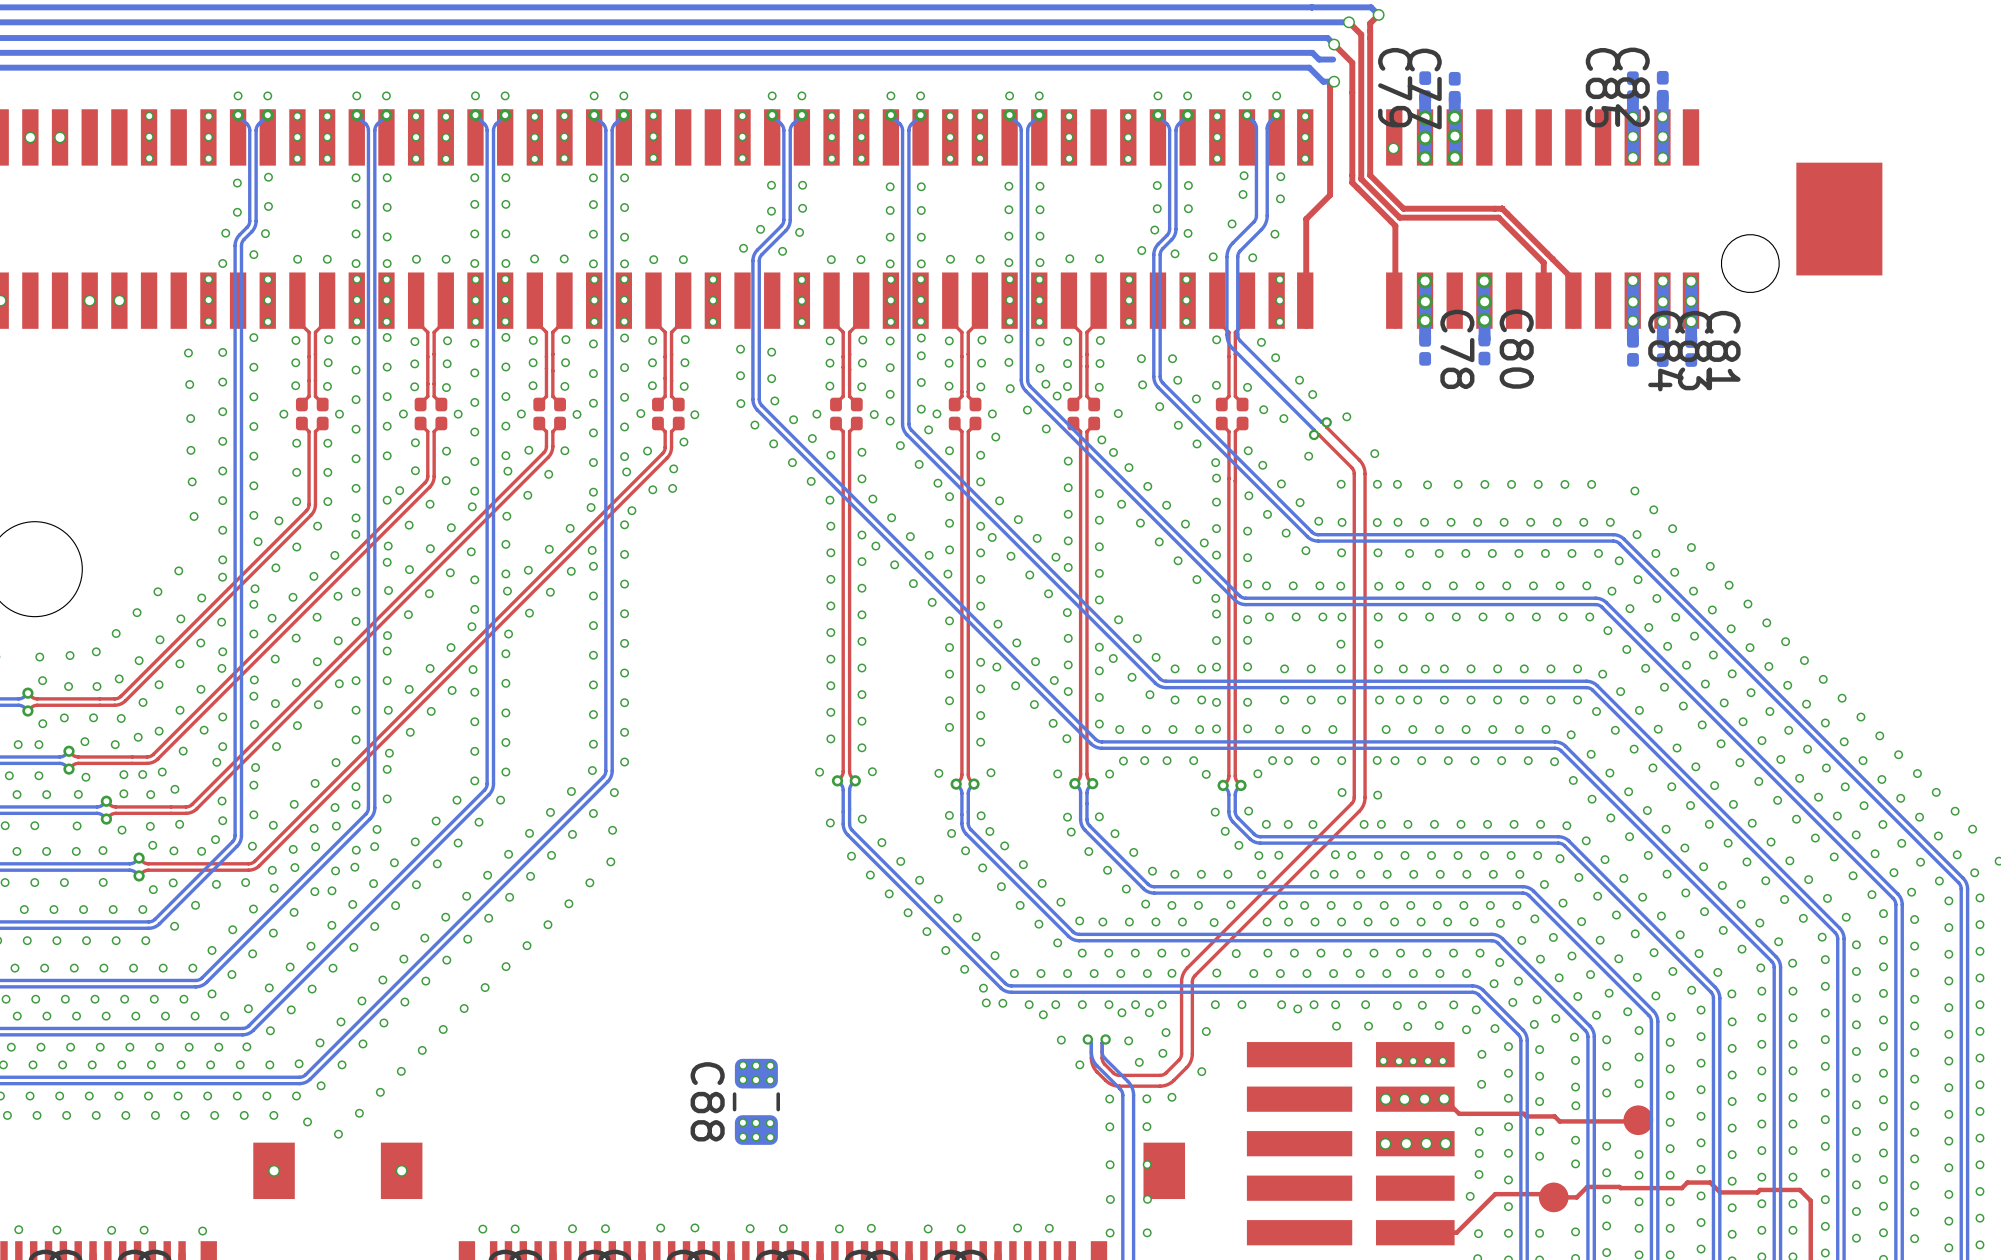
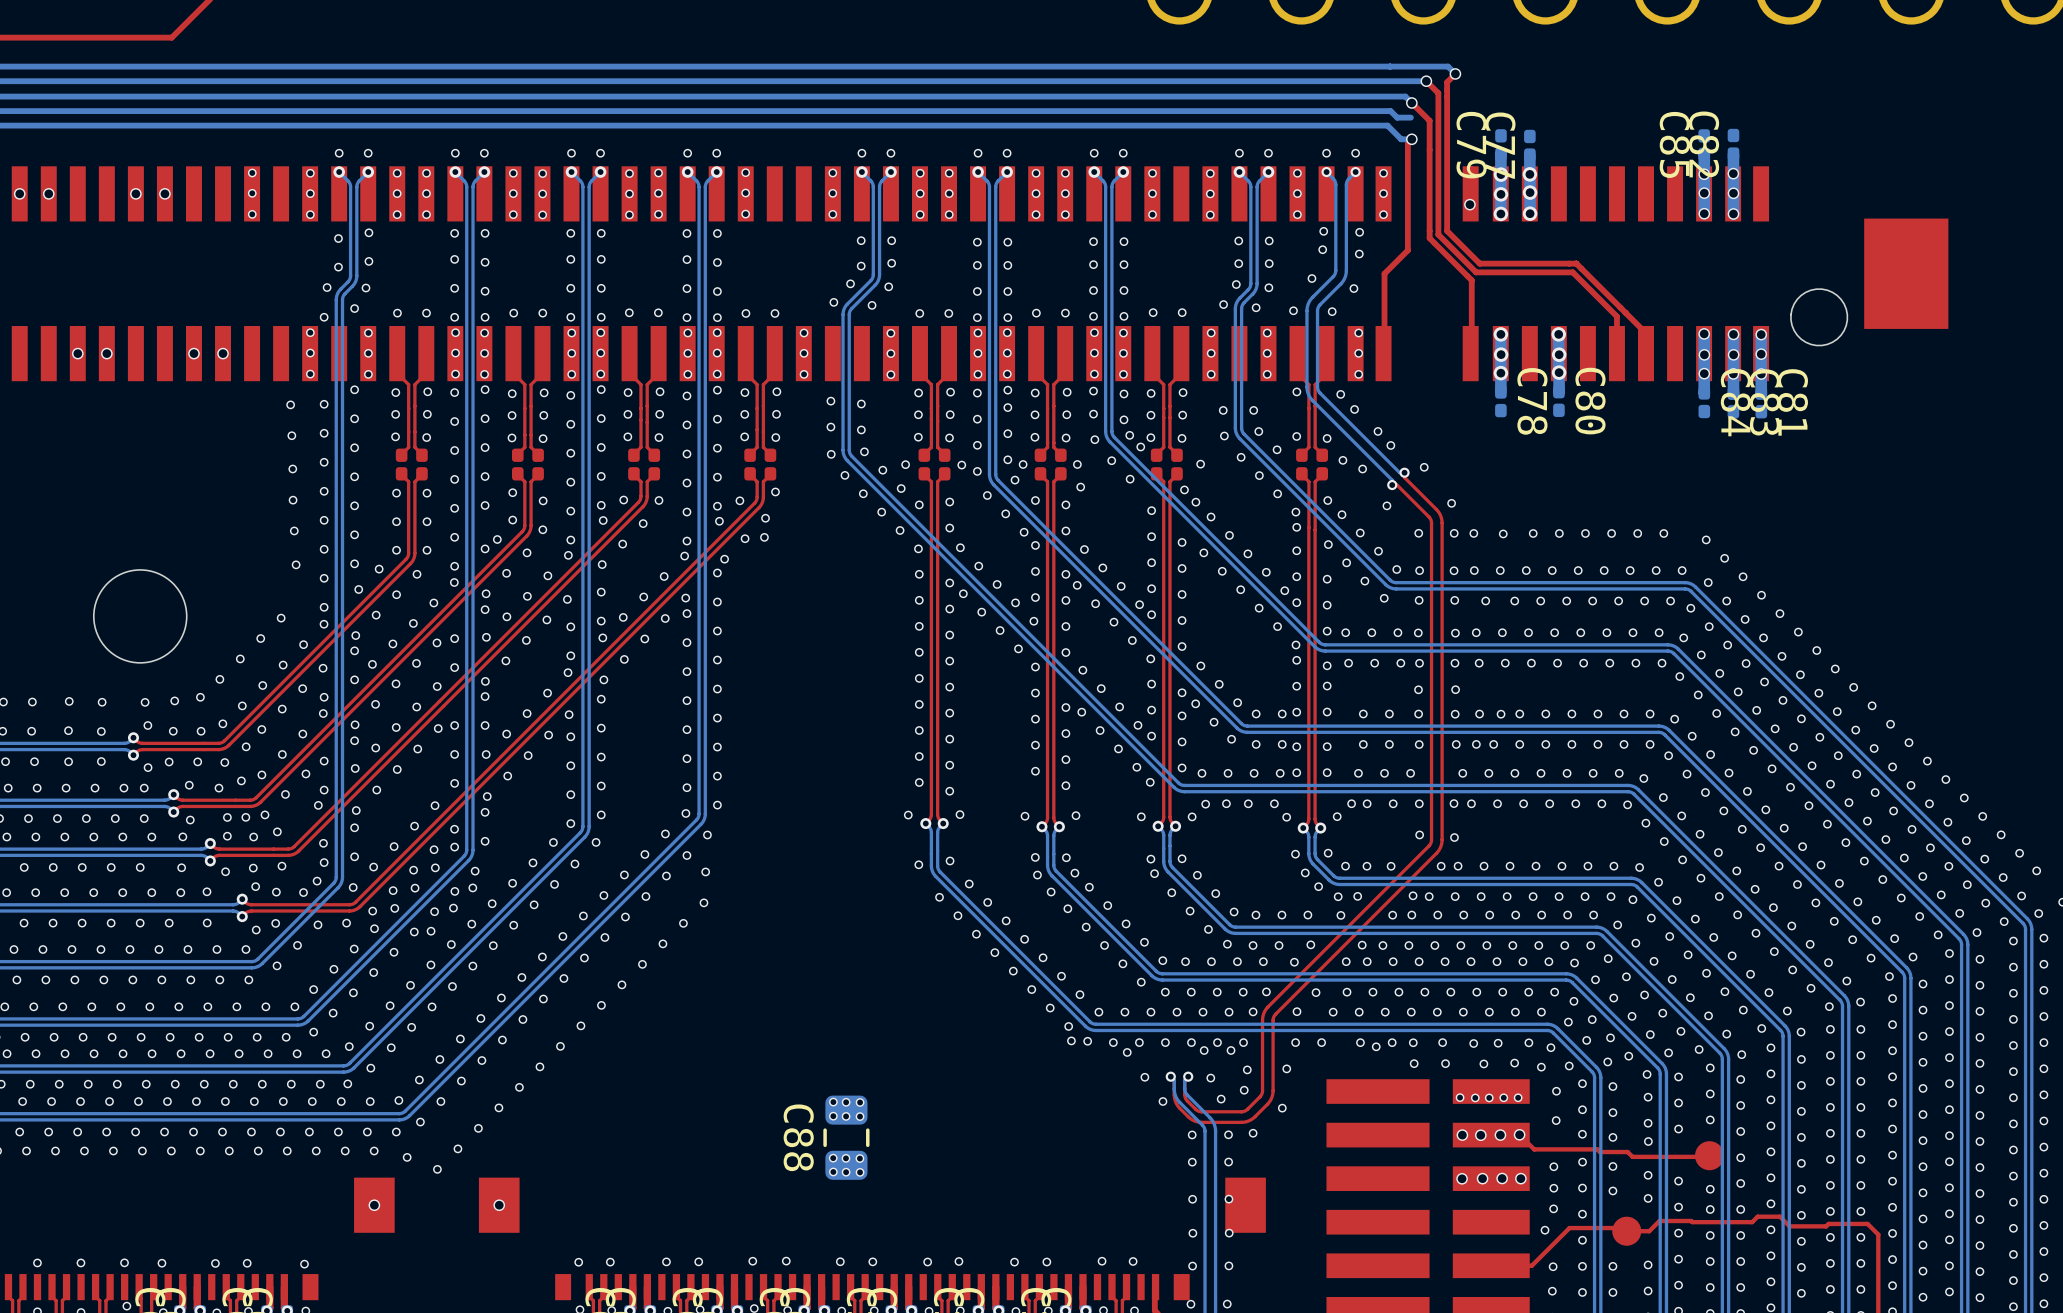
via: (640, 413) -> none
via: (283, 414) -> none
via: (339, 414) -> none
via: (403, 414) -> none
via: (458, 414) -> none
via: (521, 414) -> none
via: (577, 414) -> none
via: (694, 414) -> none

